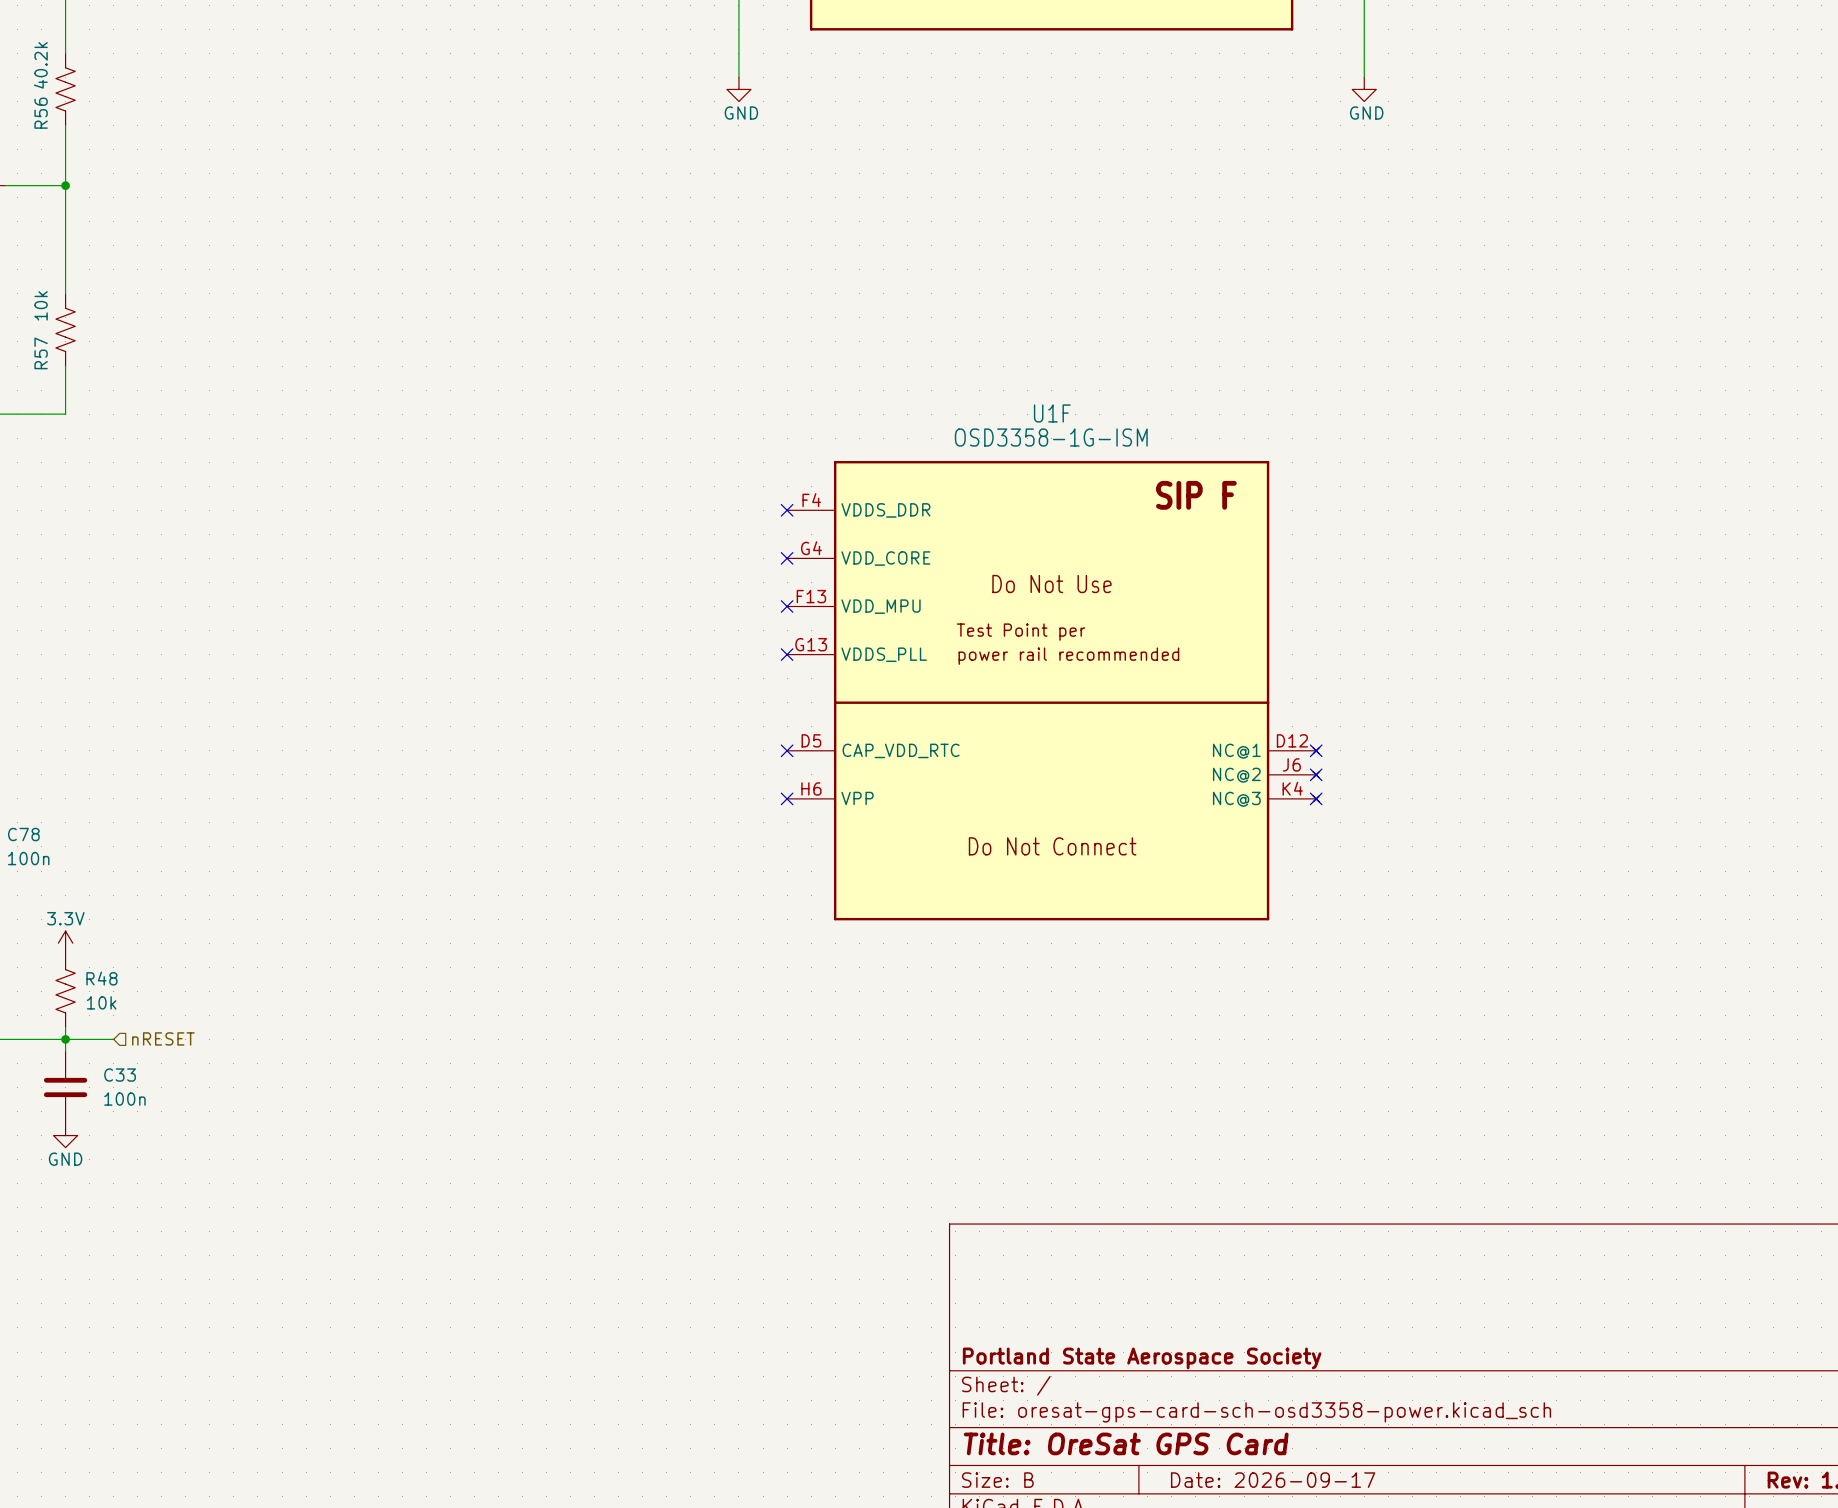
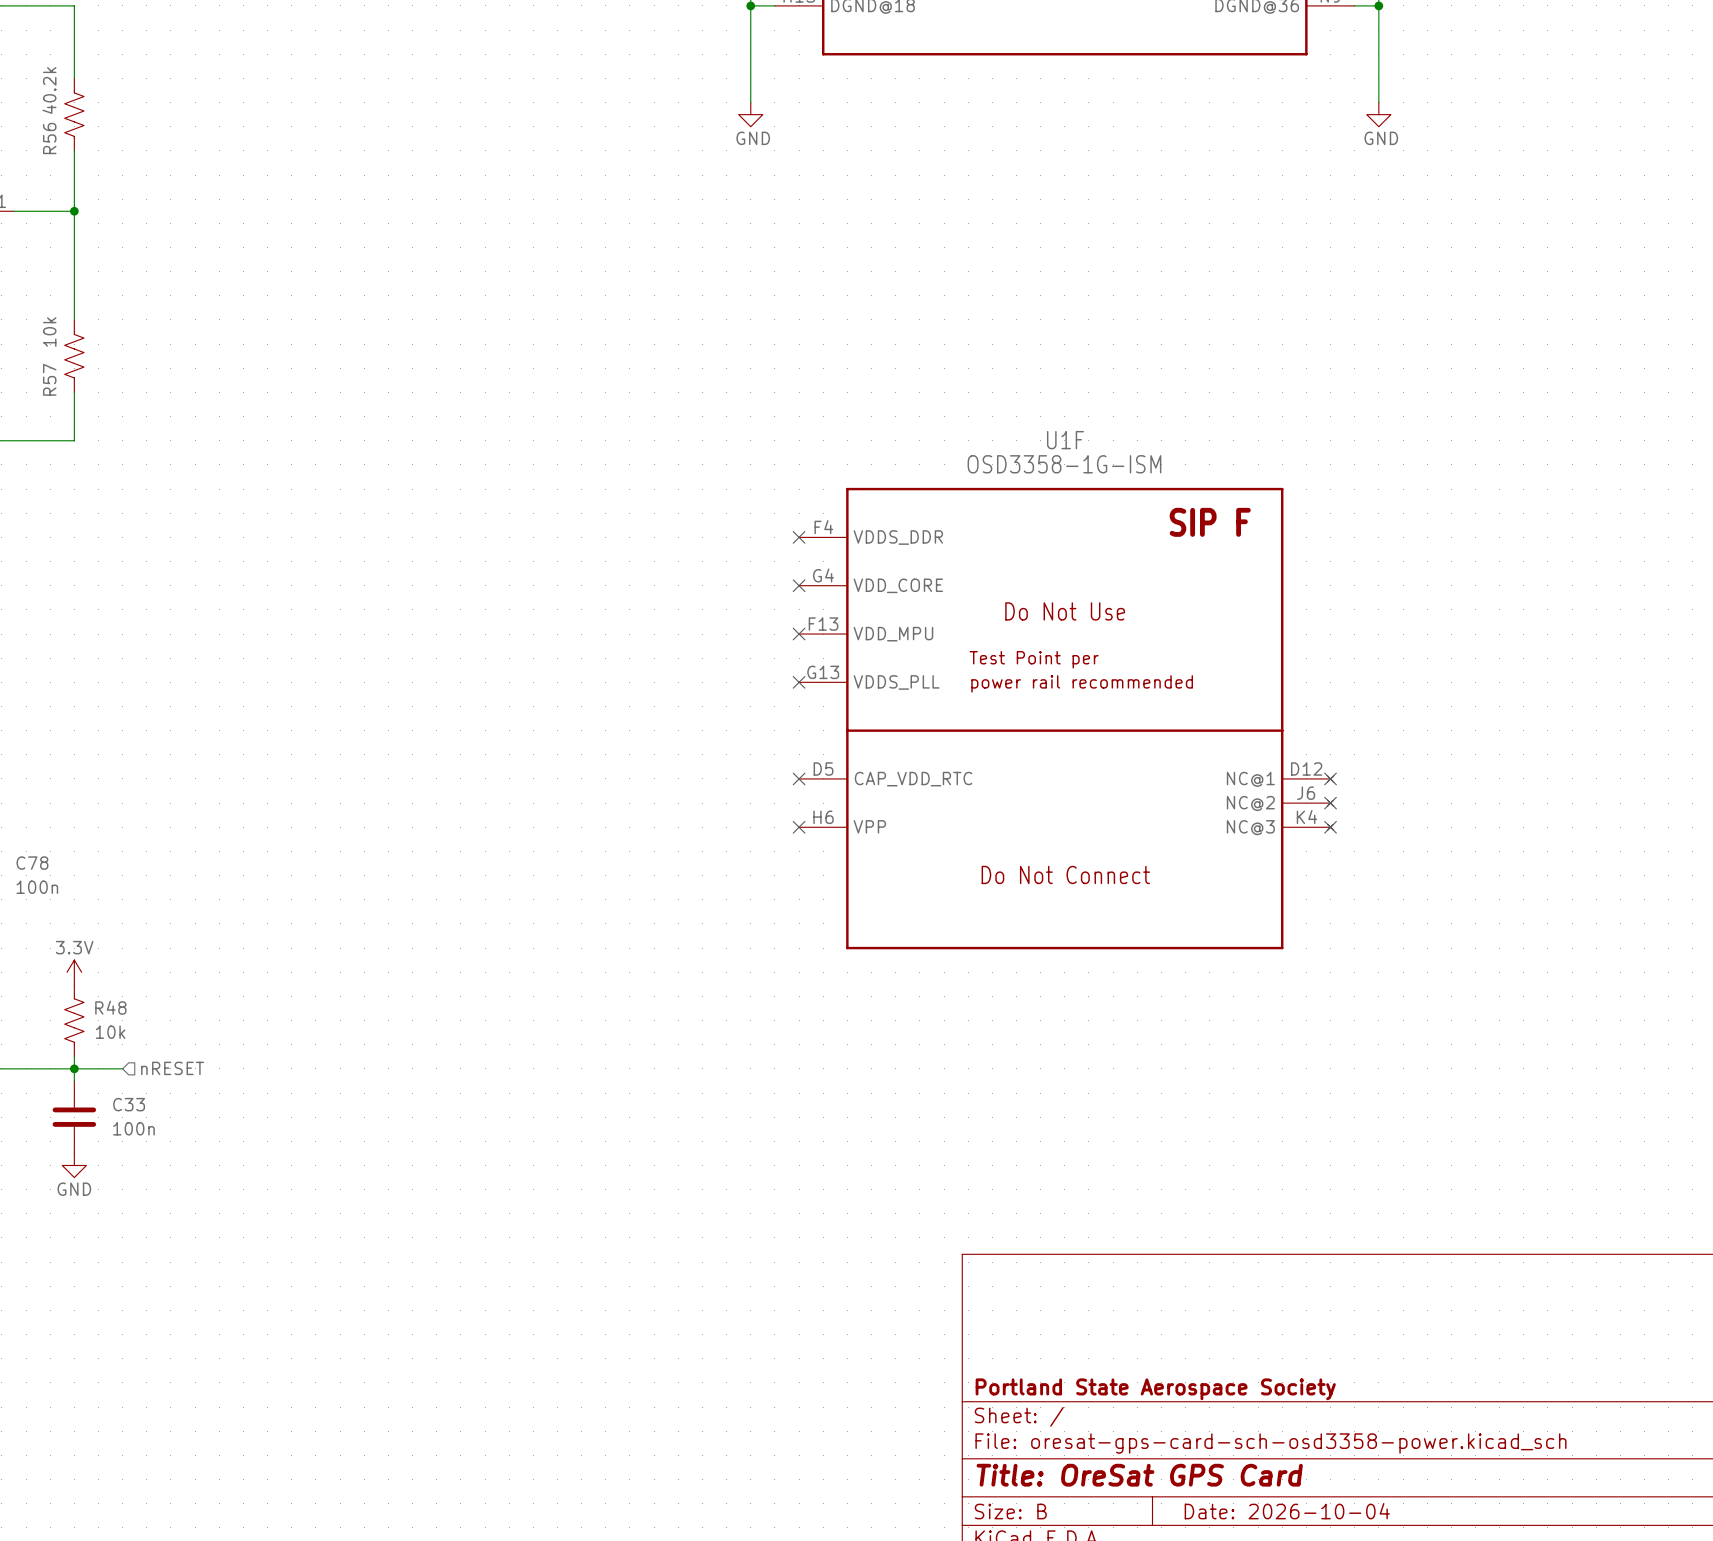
title block: Date: 2026-09-17 (1273, 1480) -> Date: 2026-10-04 (1287, 1511)

